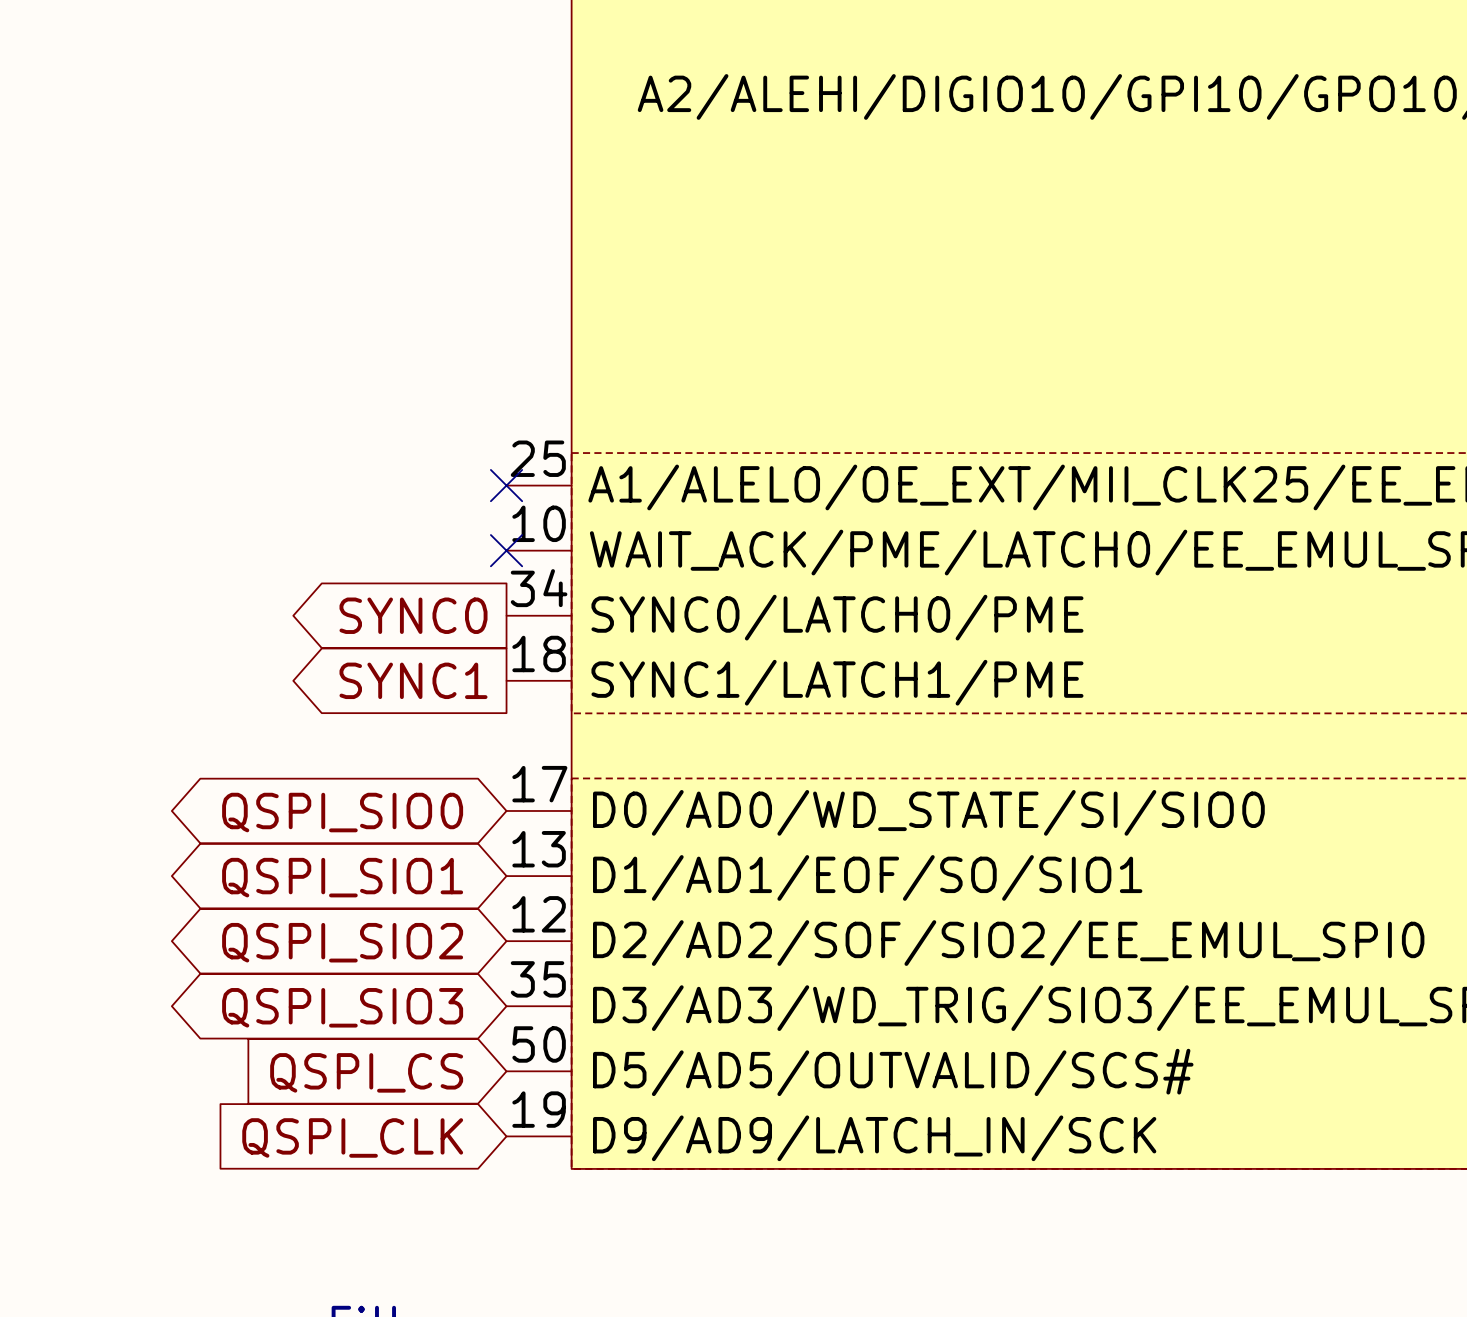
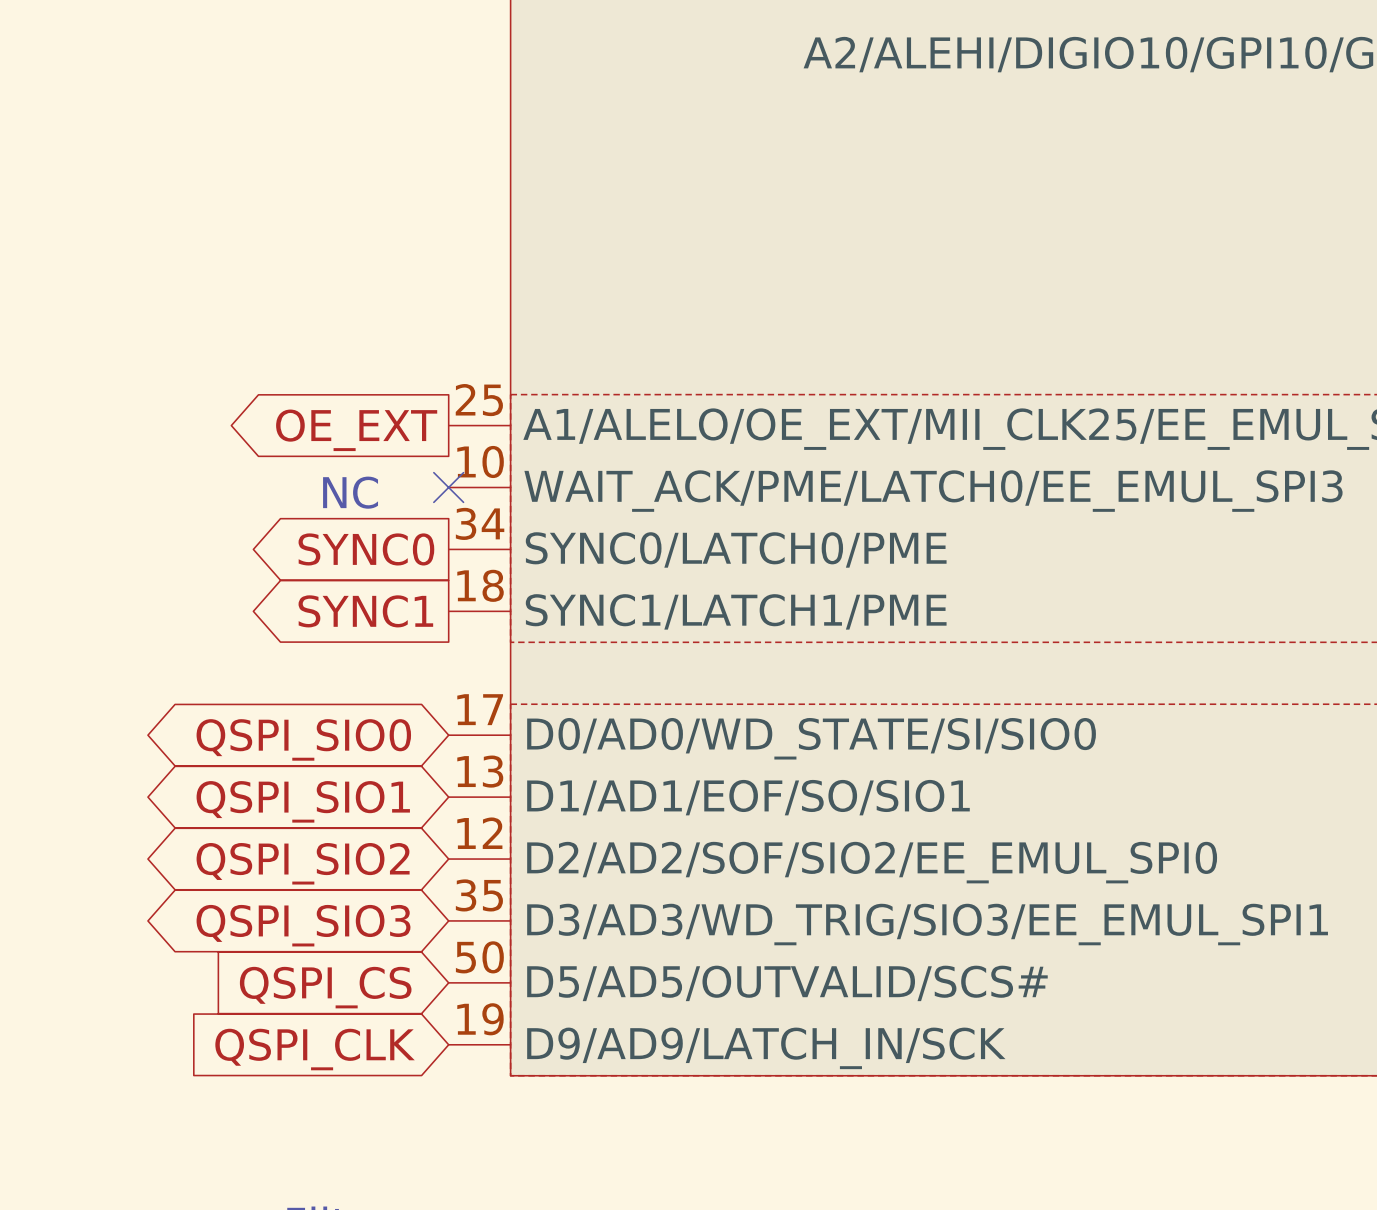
no-connect mark: (506, 485) -> none
global label: none -> OE_EXT (356, 430)
text: none -> NC (350, 492)

